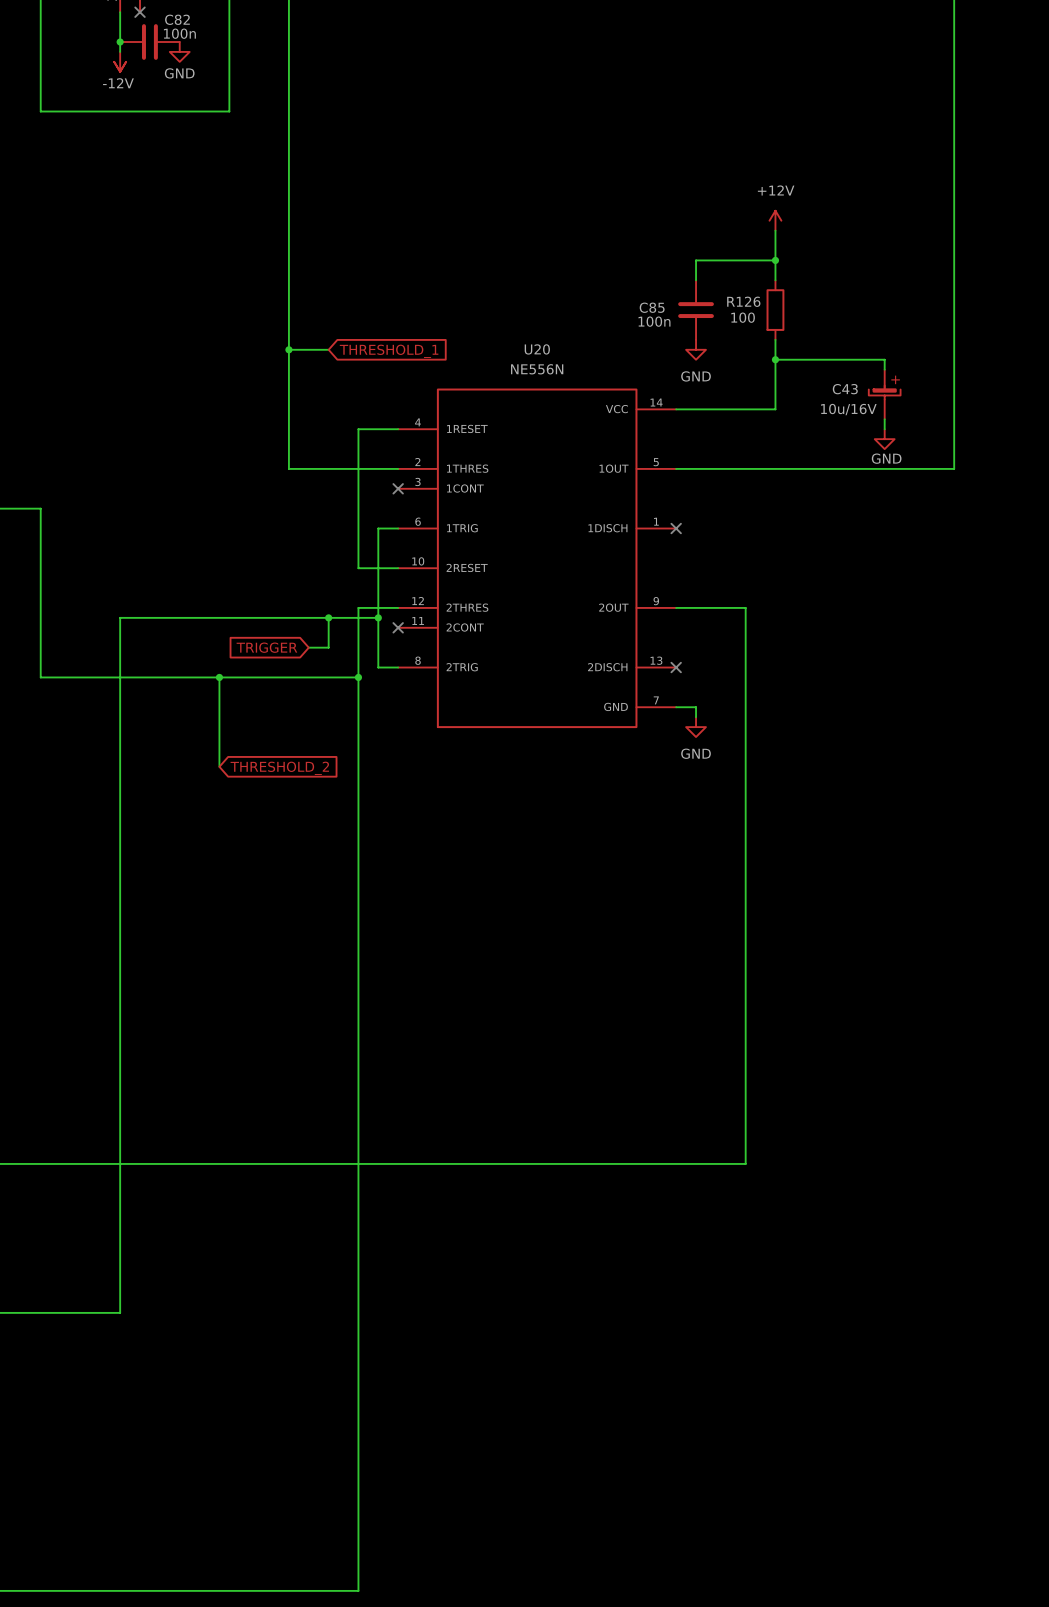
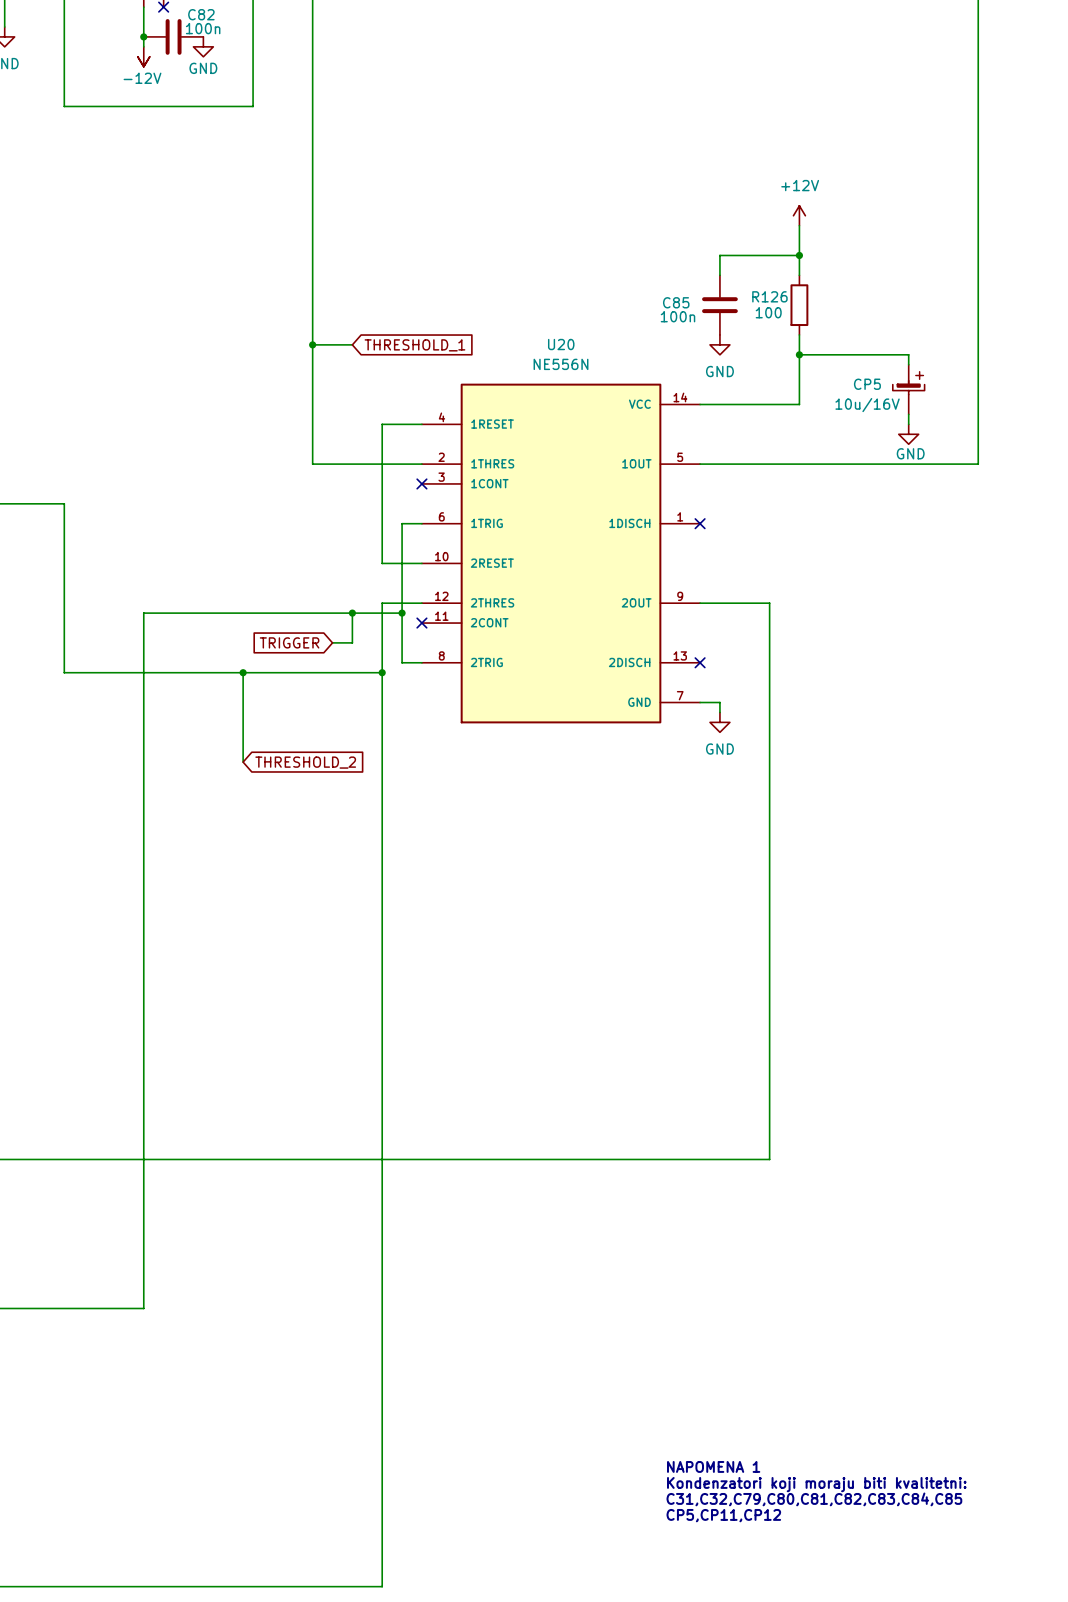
C43 name: C43 (845, 389) -> CP5 (867, 384)
text: none -> NAPOMENA 1 (713, 1466)
text: none -> Kondenzatori koji moraju biti kvalitetni: (816, 1484)
text: none -> C31,C32,C79,C80,C81,C82,C83,C84,C85 (814, 1499)
text: none -> CP5,CP11,CP12 (723, 1515)

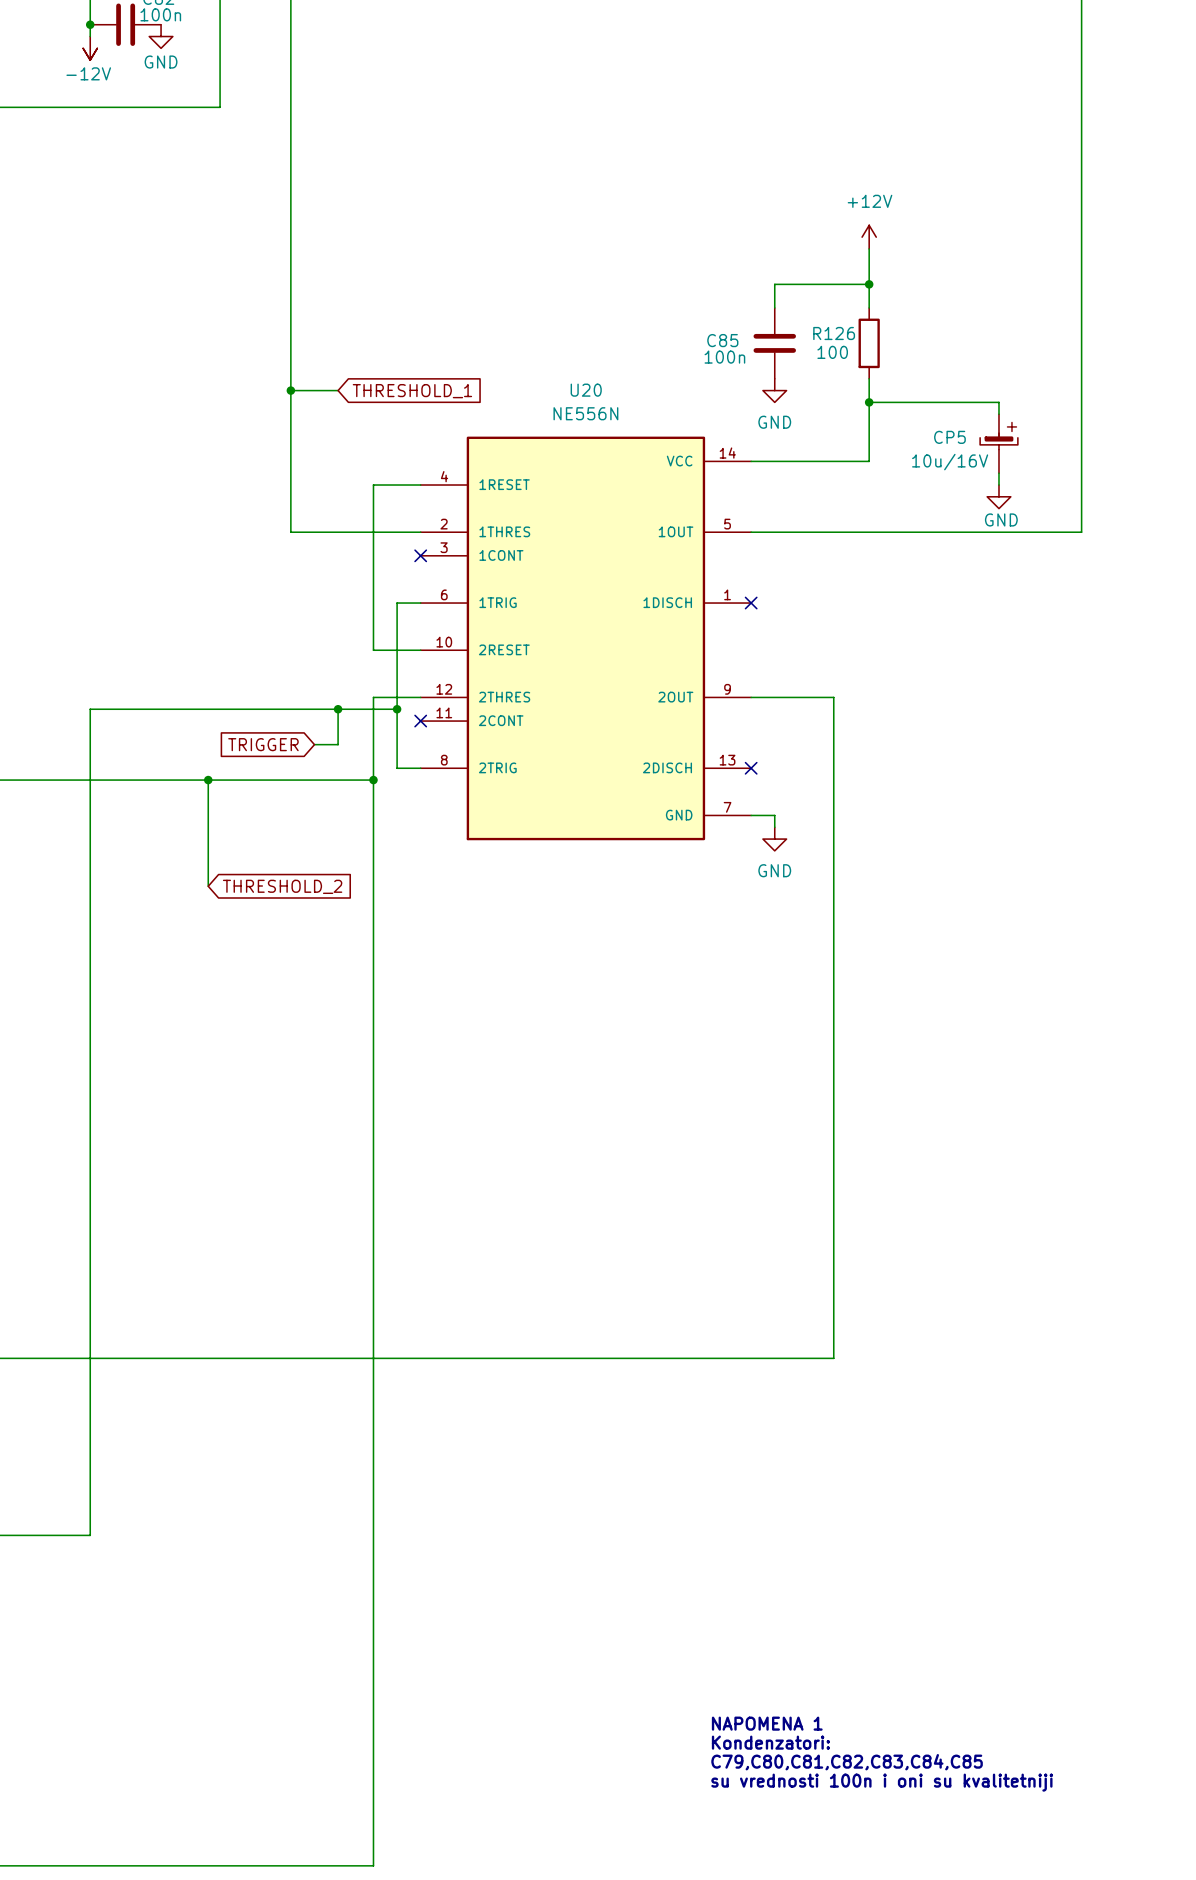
text: Kondenzatori koji moraju biti kvalitetni: (816, 1484) -> Kondenzatori: (770, 1742)
text: C31,C32,C79,C80,C81,C82,C83,C84,C85 (814, 1499) -> C79,C80,C81,C82,C83,C84,C85 (847, 1762)
text: CP5,CP11,CP12 (723, 1515) -> su vrednosti 100n i oni su kvalitetniji (882, 1782)

